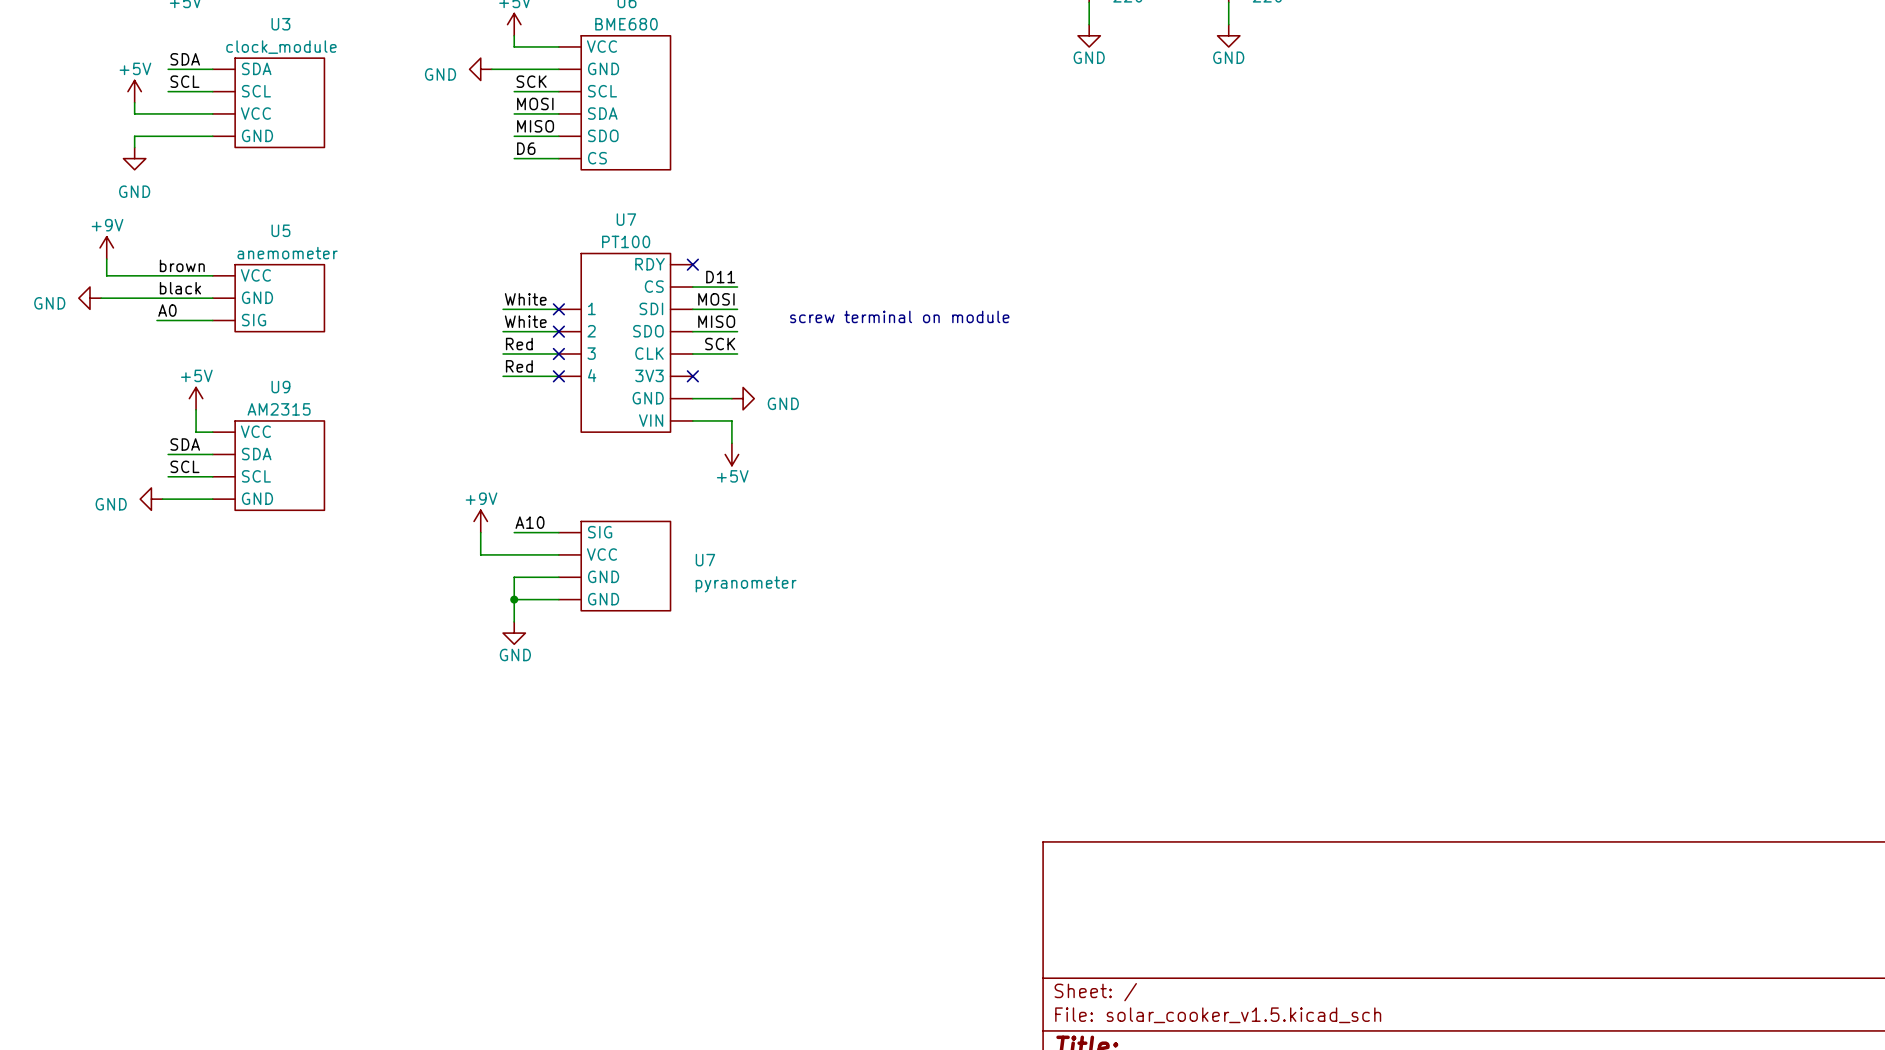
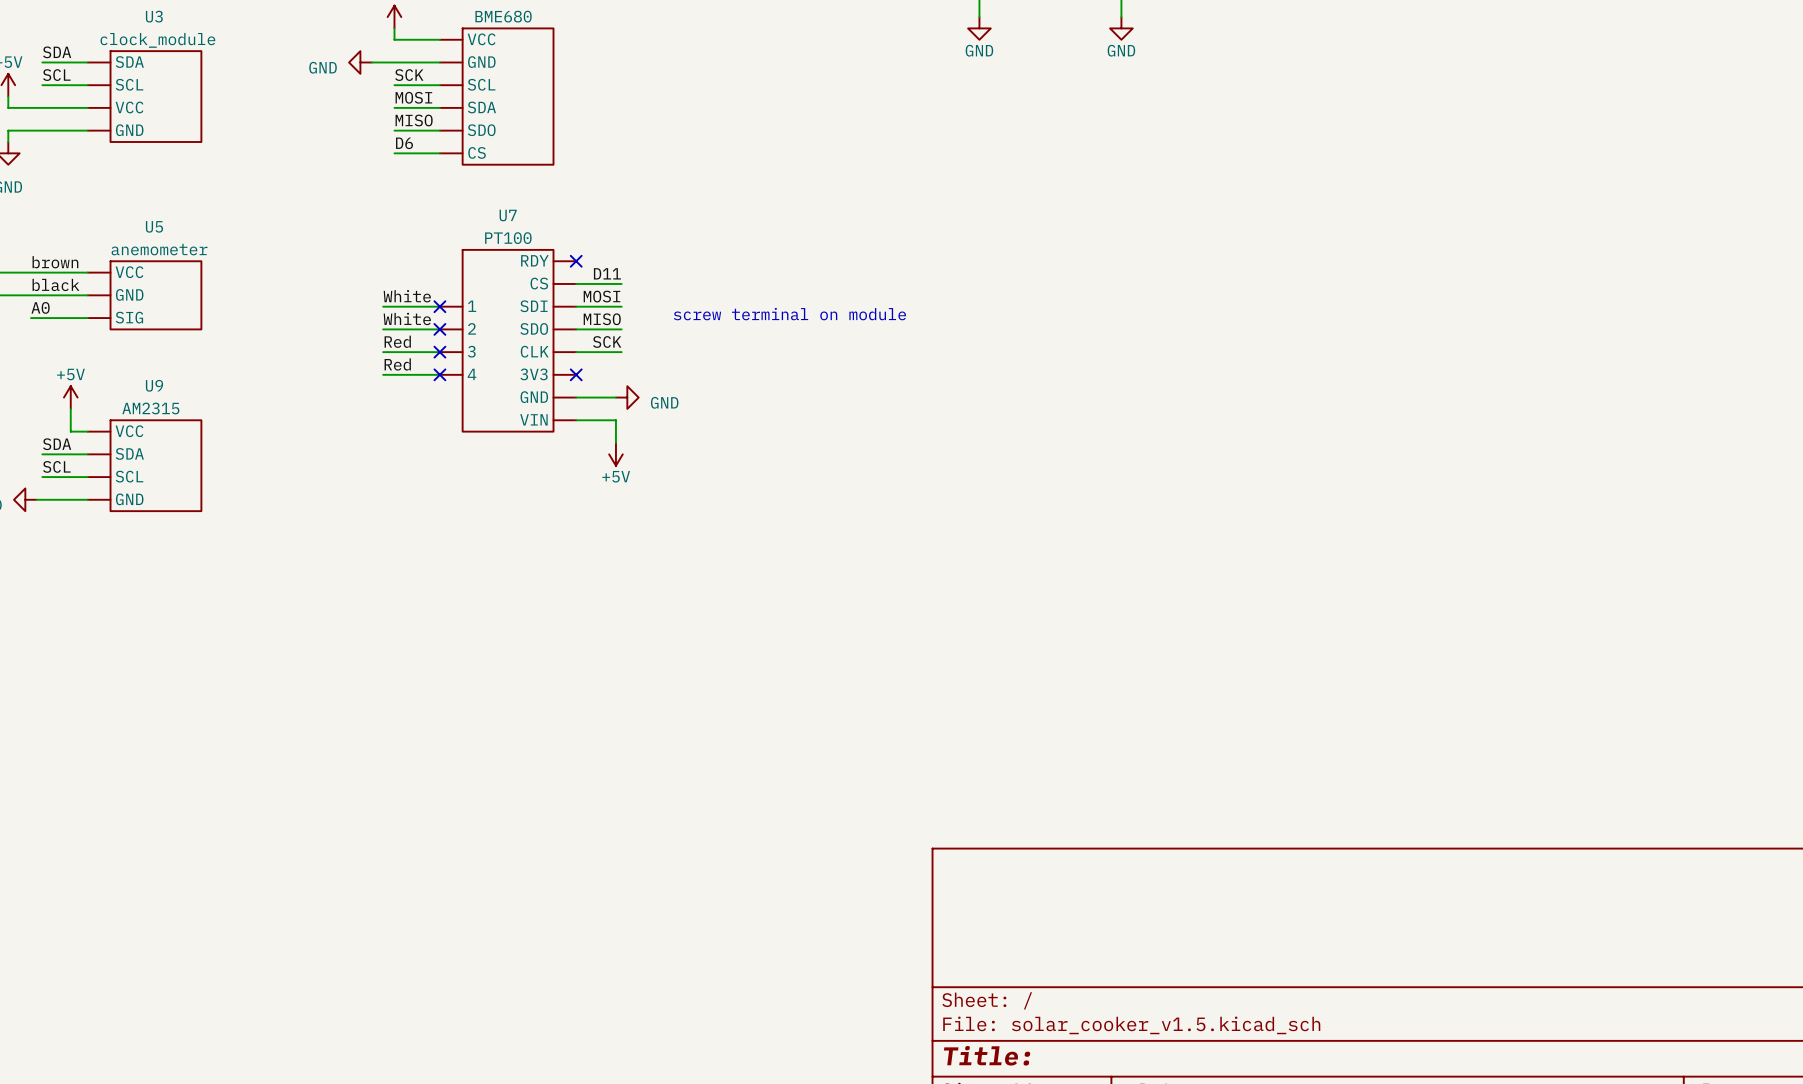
power symbol: +9V (480, 521) -> none
label: A10 (529, 522) -> none
wire: (480, 532) (480, 554) (558, 554) -> none
wire: (514, 532) (558, 532) -> none
U7: pyranometer (614, 566) -> none
wire: (558, 577) (514, 577) (514, 621) -> none
wire: (514, 599) (558, 599) -> none
junction: (514, 599) -> none
power symbol: GND (514, 633) -> none

